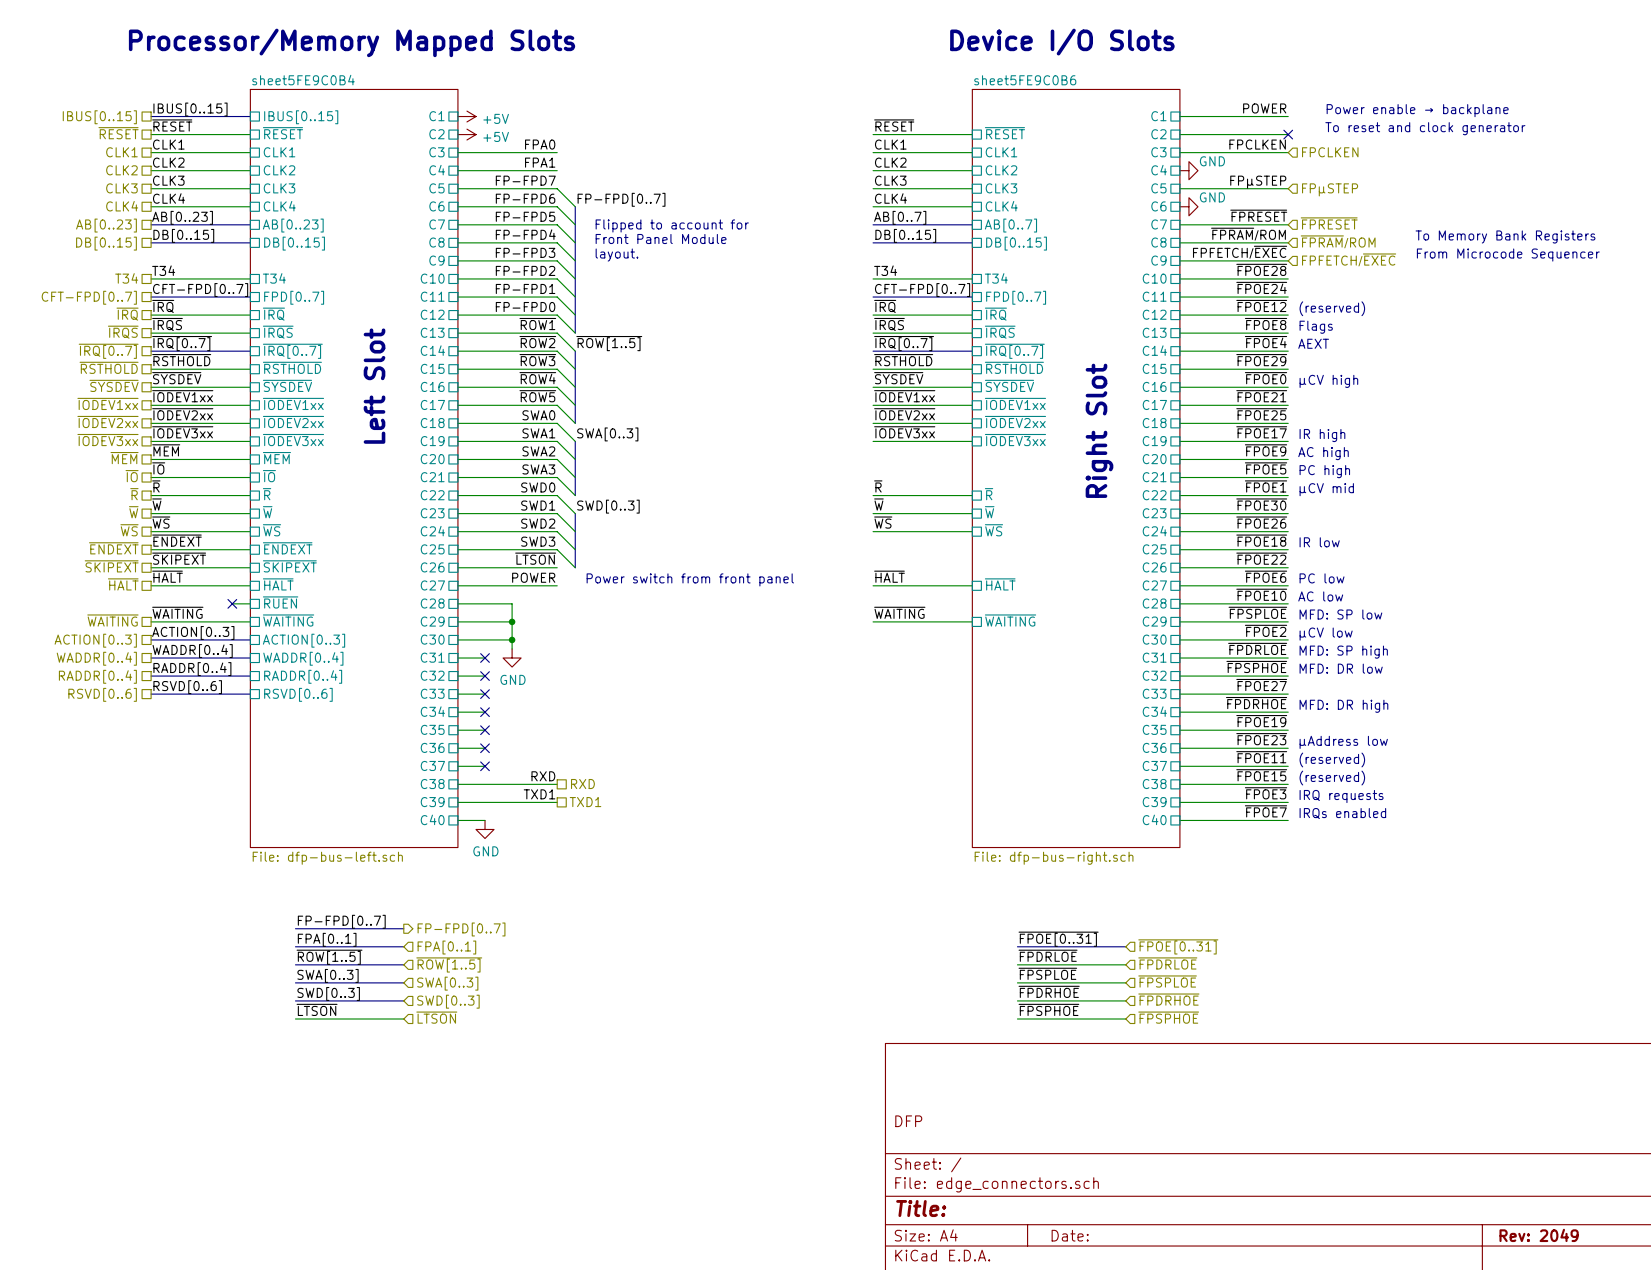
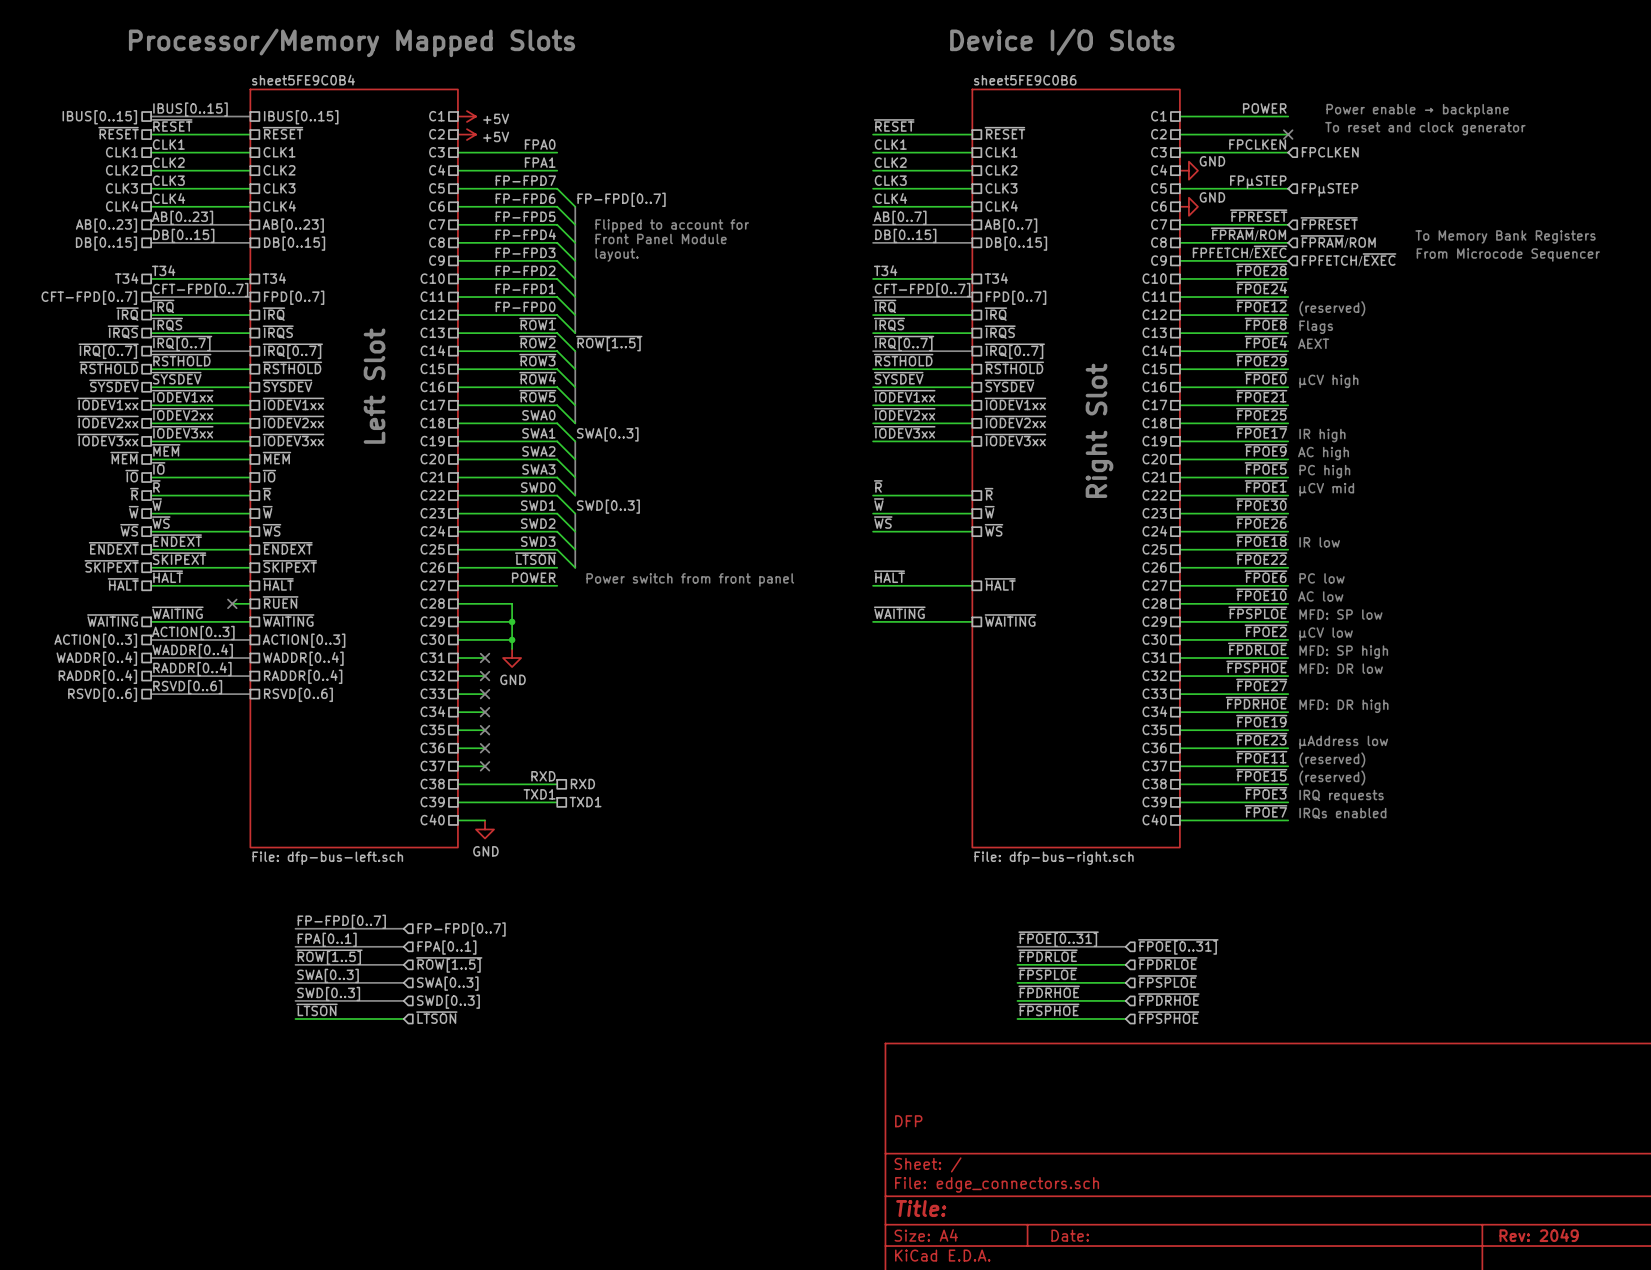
hierarchical label shape: output (461, 929) -> input (461, 929)

